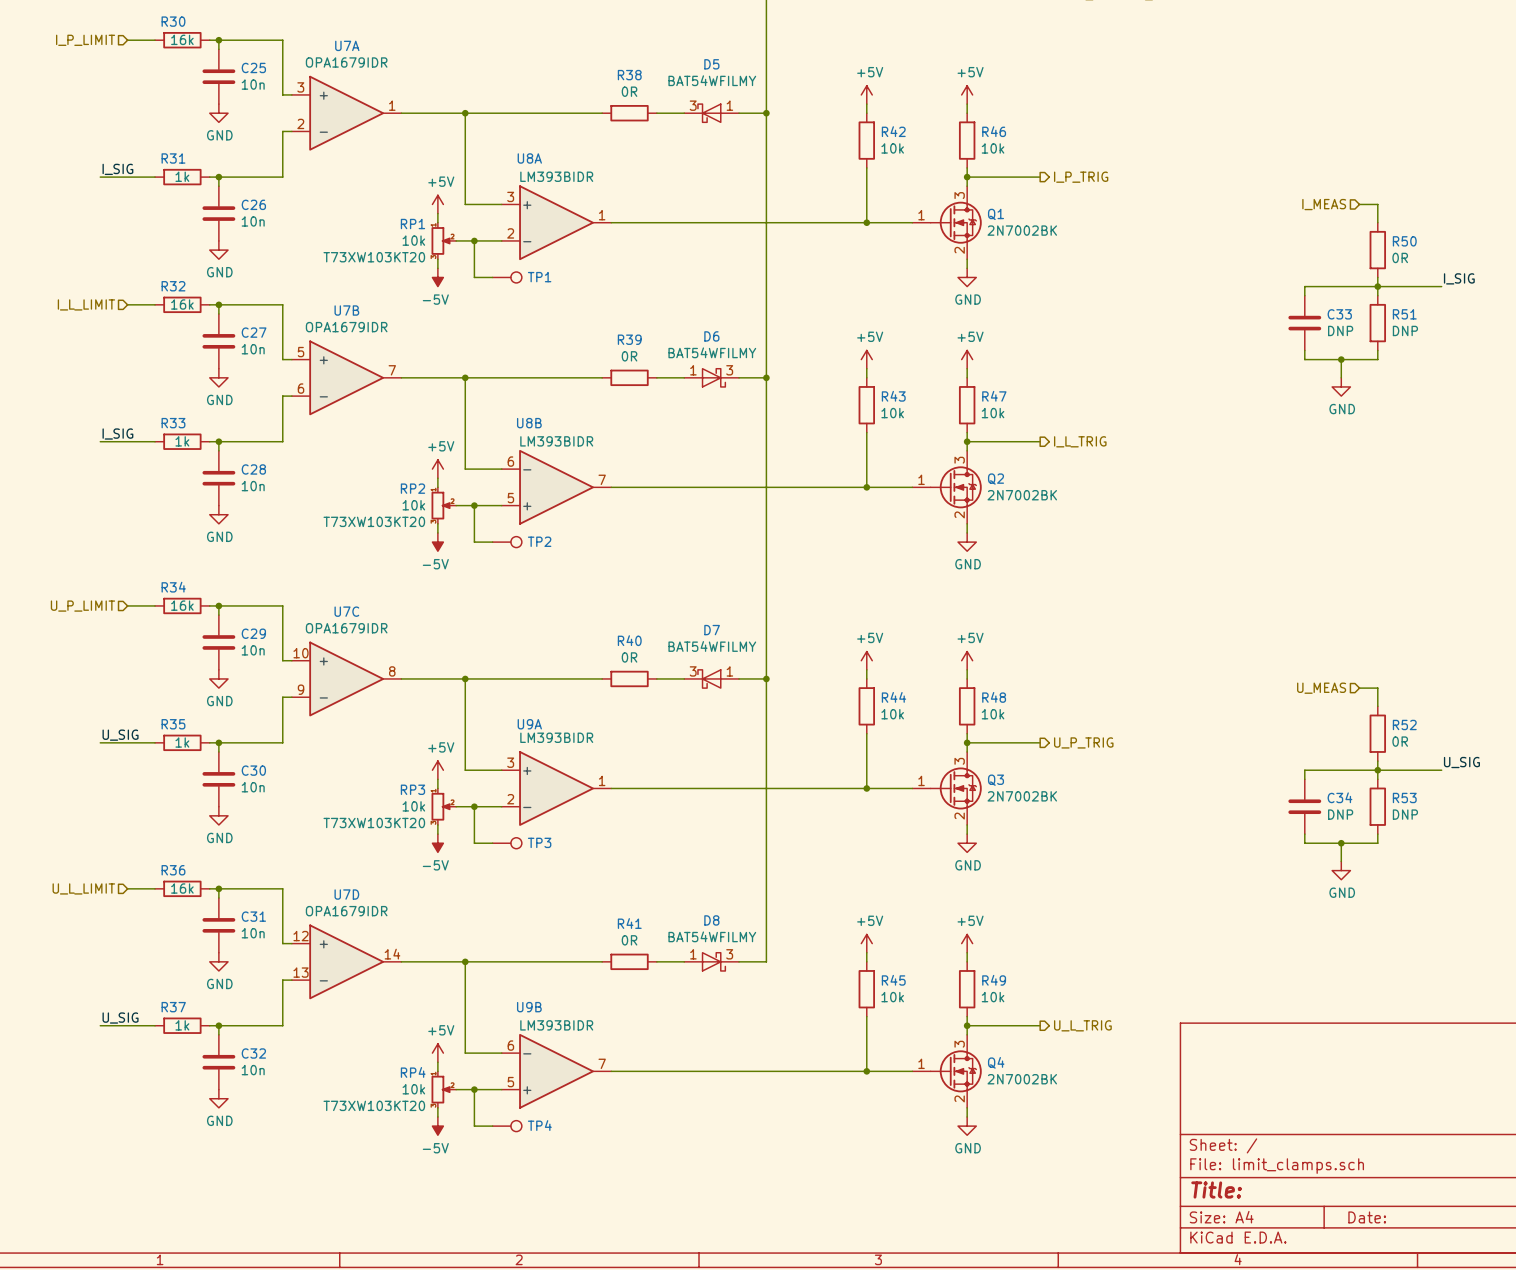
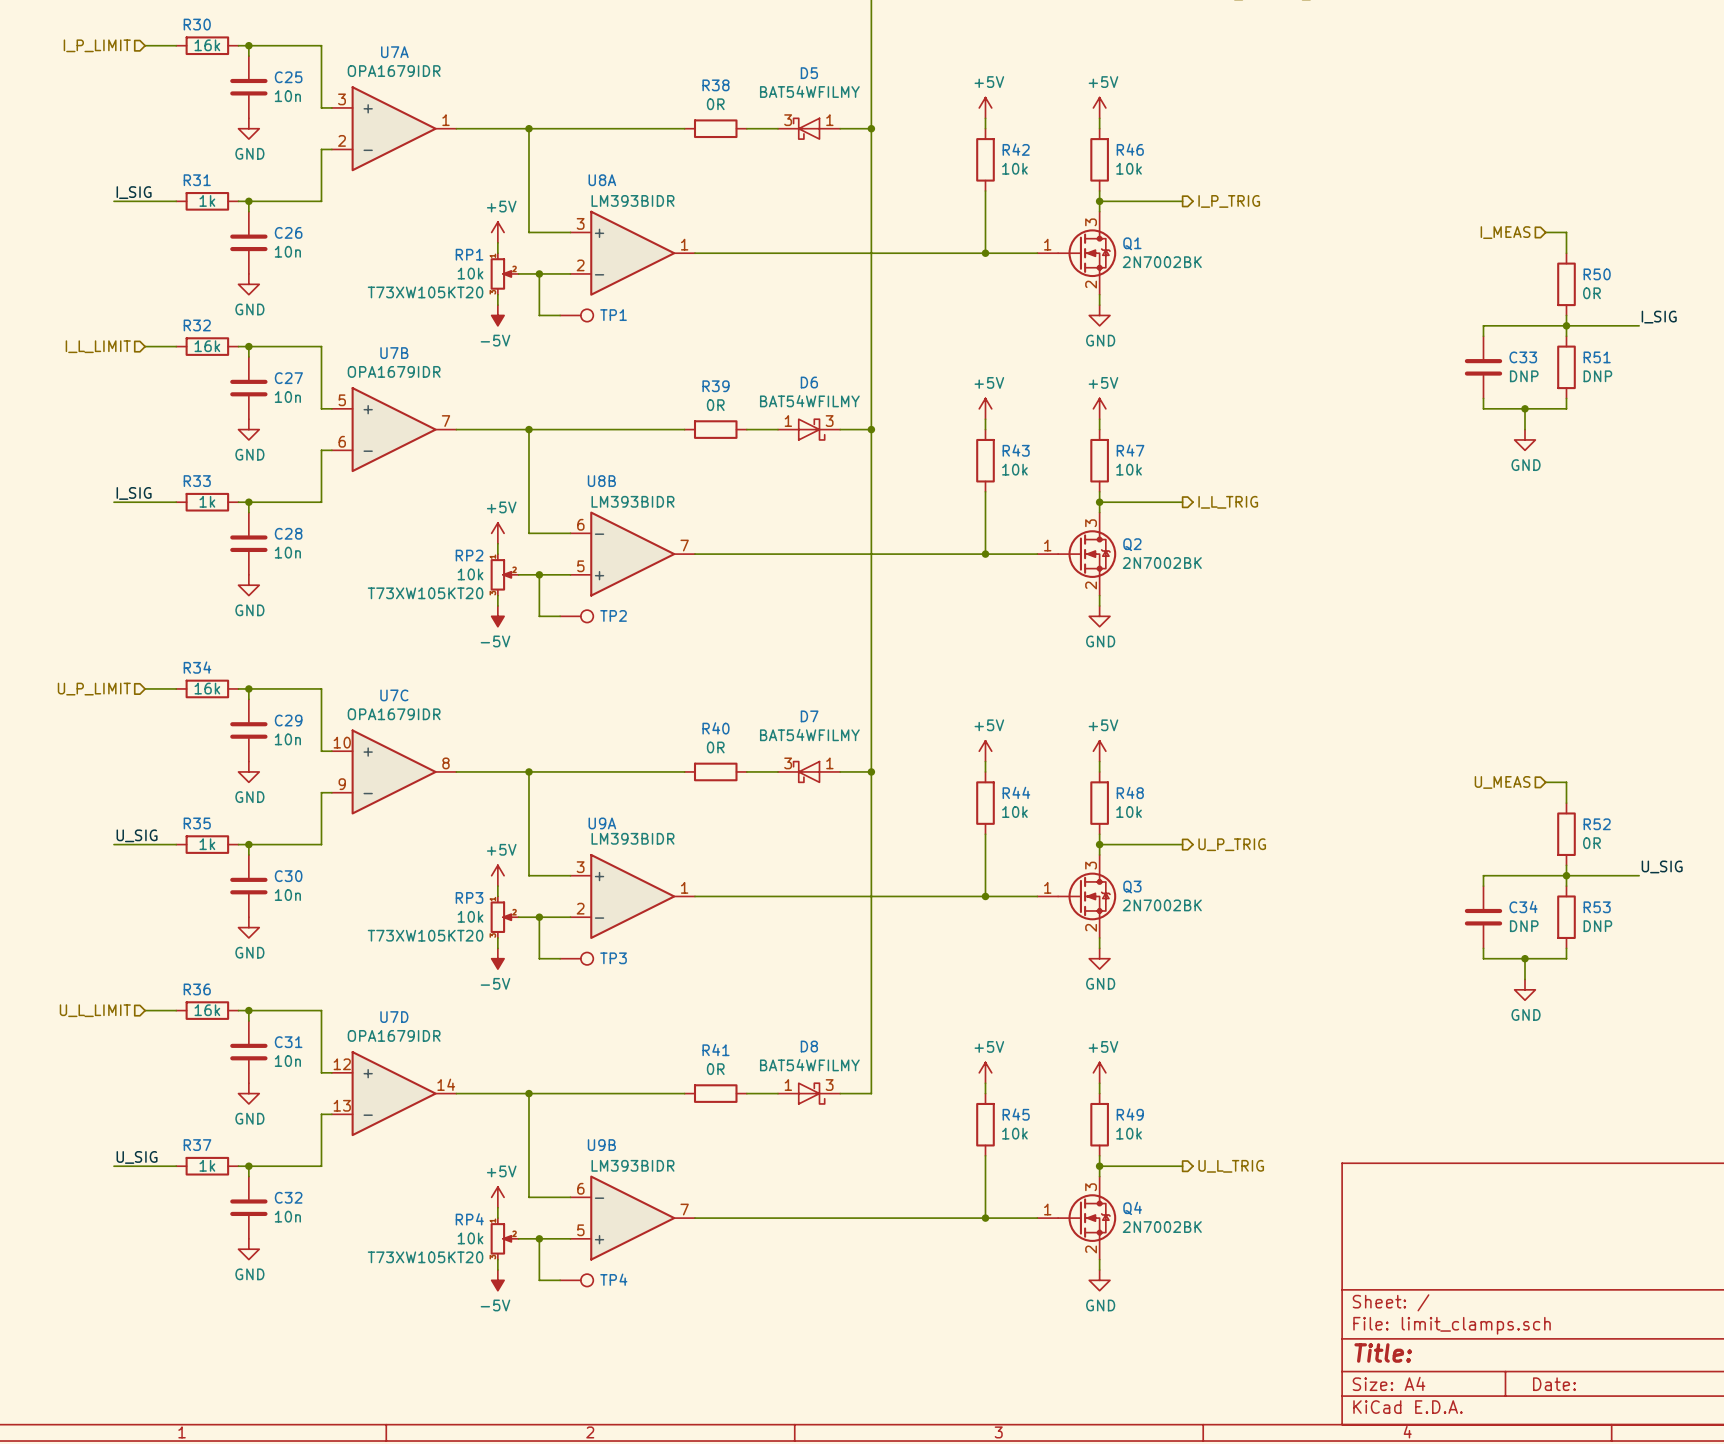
RP1 text: T73XW103KT20 (374, 257) -> T73XW105KT20 (425, 292)
RP2 text: T73XW103KT20 (374, 521) -> T73XW105KT20 (425, 593)
RP3 text: T73XW103KT20 (374, 822) -> T73XW105KT20 (425, 935)
RP4 text: T73XW103KT20 (374, 1105) -> T73XW105KT20 (425, 1257)

